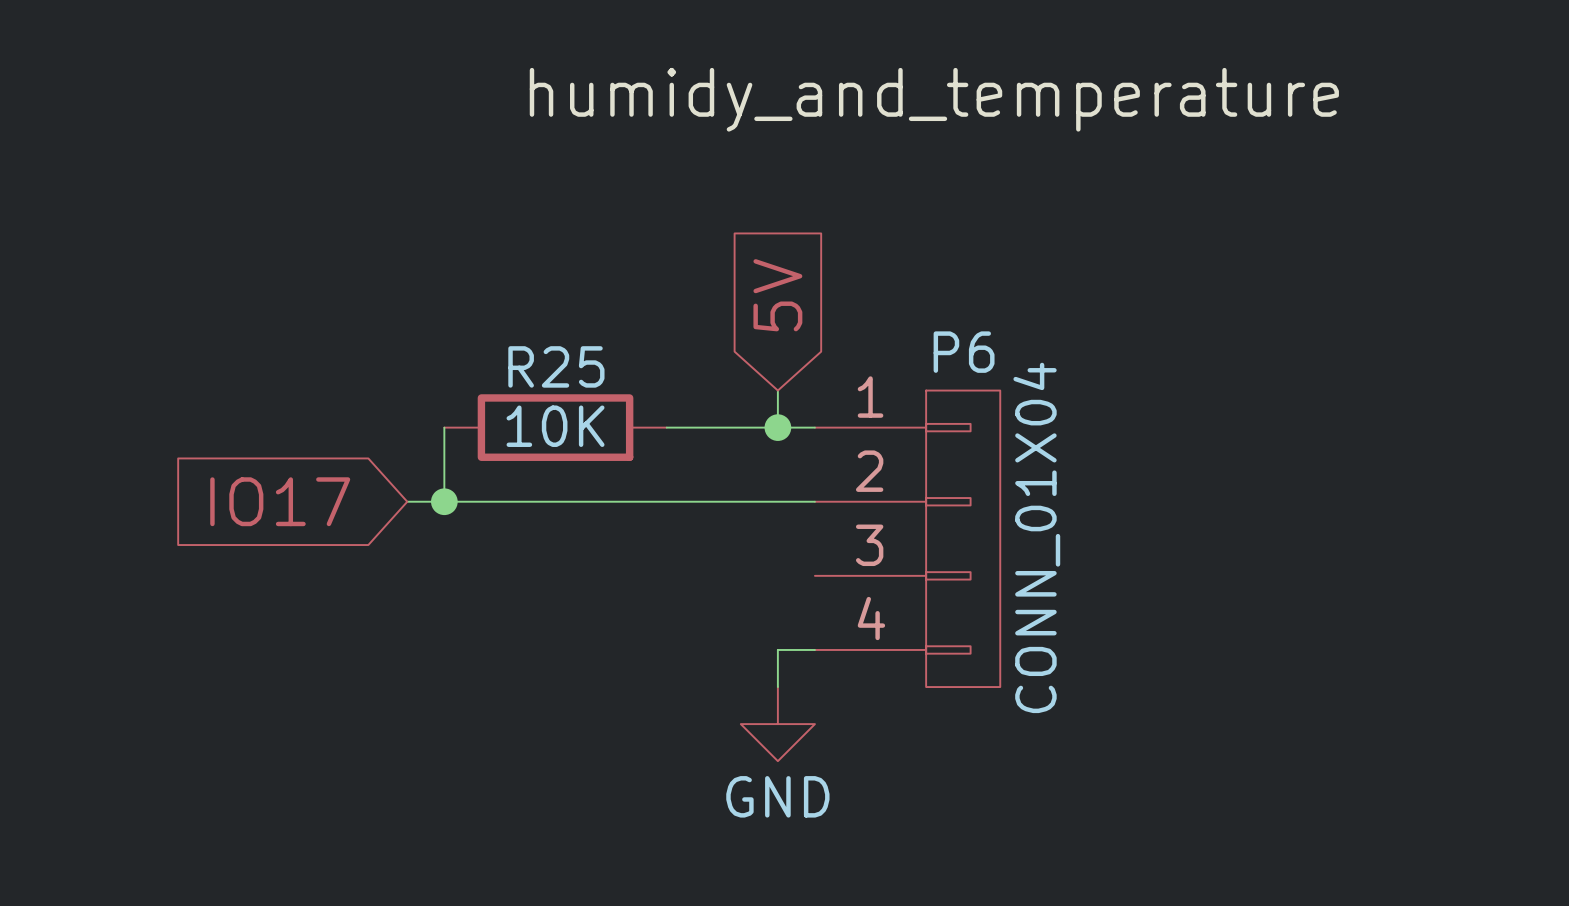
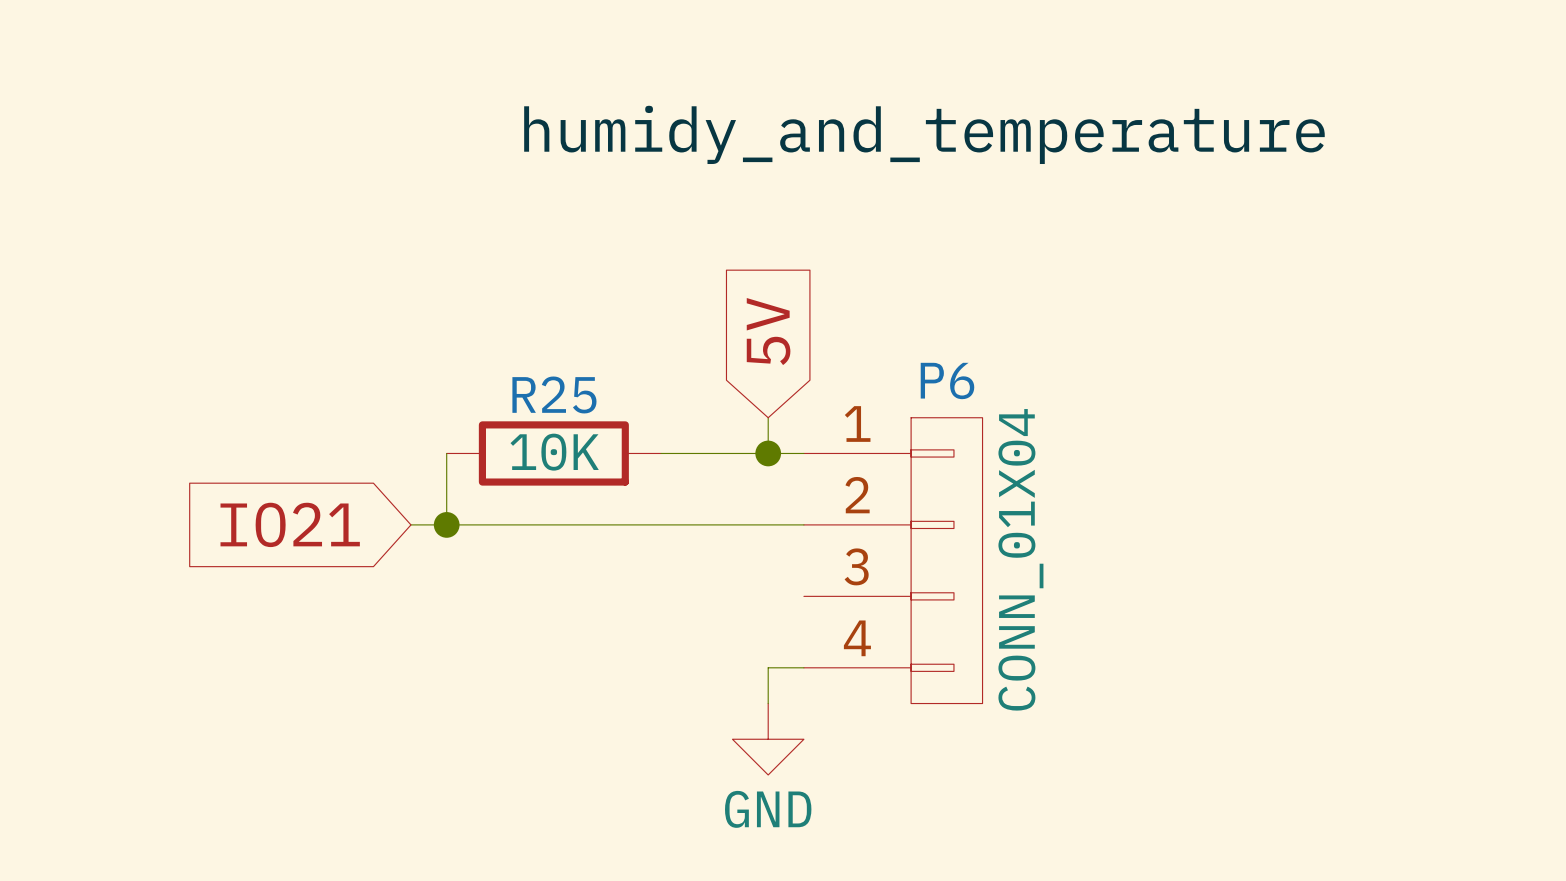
global label: IO17 (280, 501) -> IO21 (290, 524)

